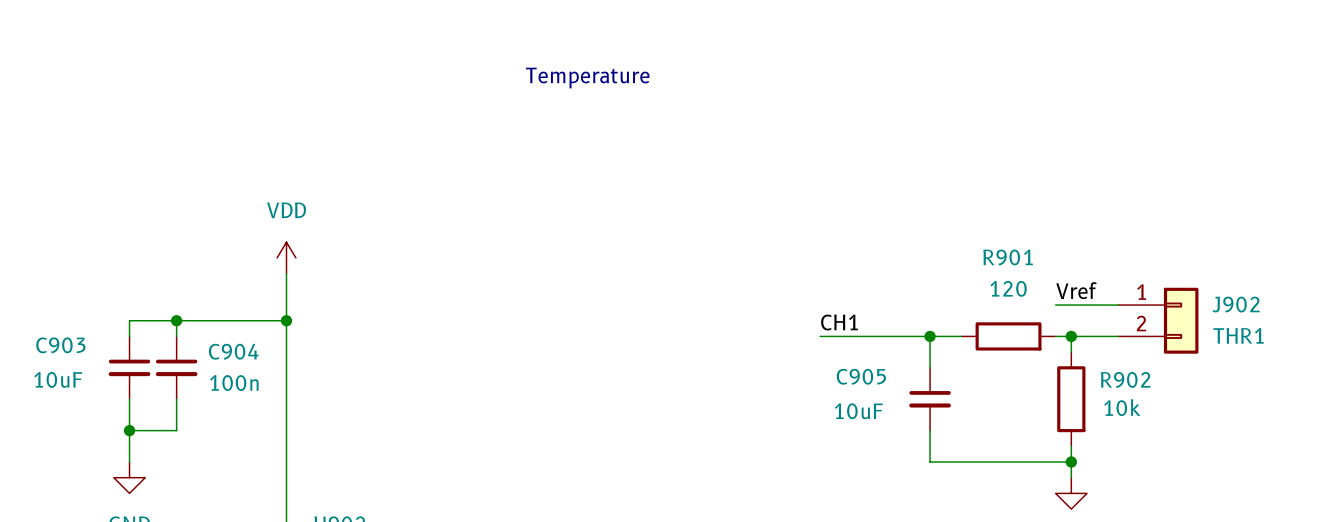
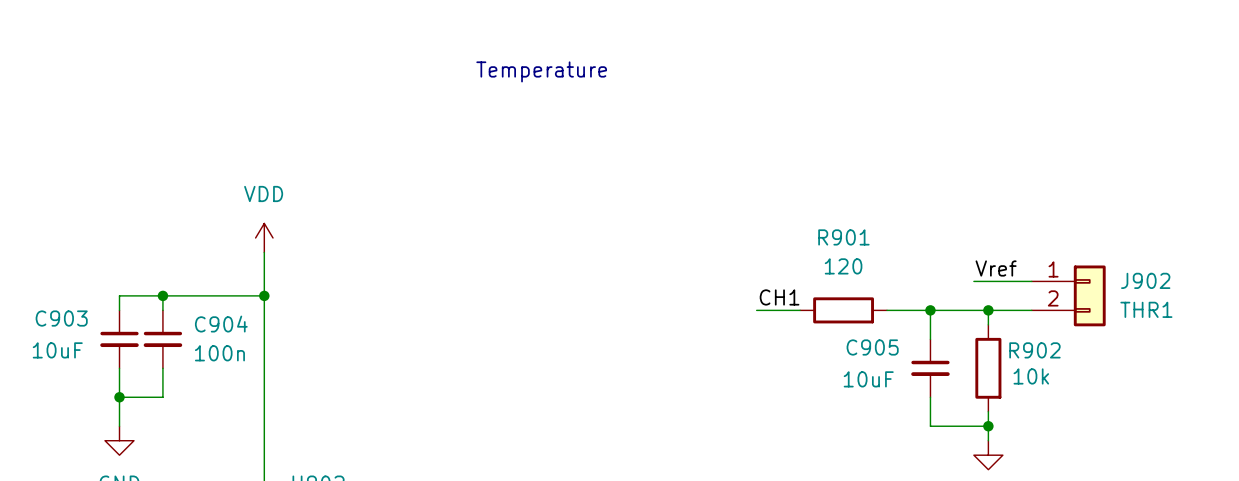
wire: (867, 336) (961, 336) -> (973, 310) (887, 310)
wire: (930, 336) (930, 367) -> (930, 310) (930, 339)
junction: (930, 336) -> none
junction: none -> (930, 310)
R901 position: (1008, 336) -> (843, 310)
C905 position: (930, 399) -> (930, 368)
wire: (930, 430) (930, 462) (1008, 462) -> (930, 397) (930, 426)

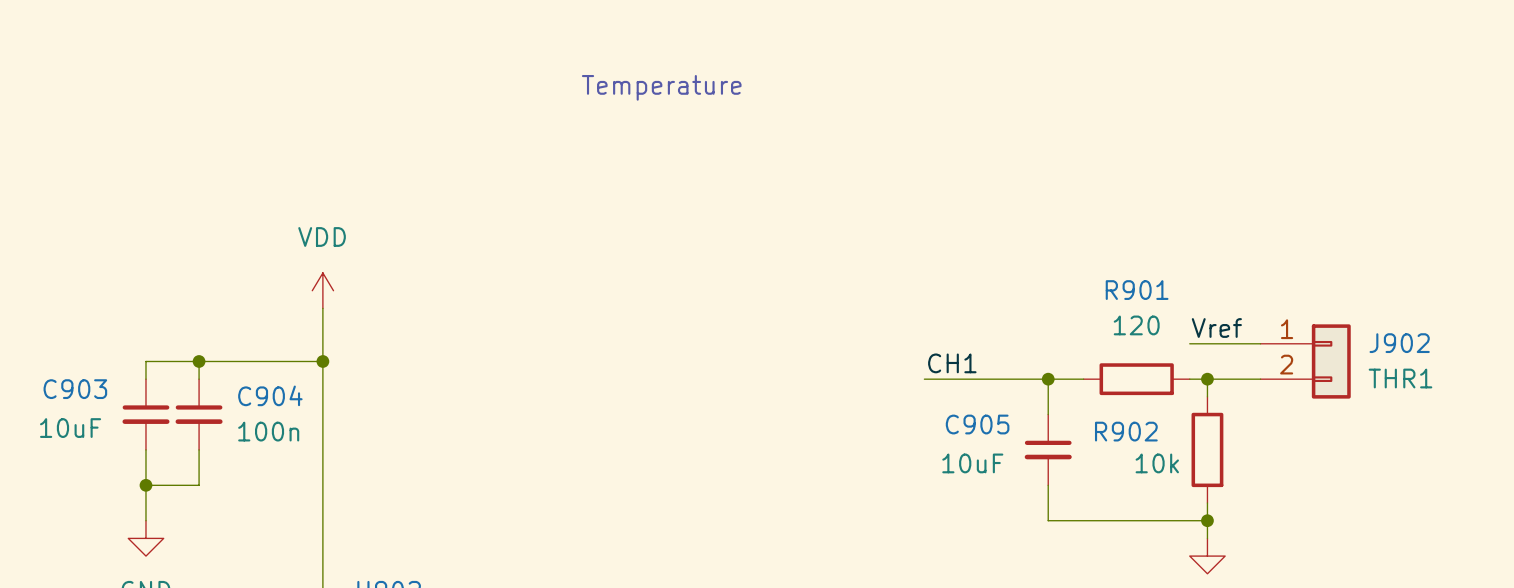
R901 position: (843, 310) -> (1136, 379)
junction: none -> (1048, 379)
wire: (887, 310) (973, 310) -> (1083, 379) (977, 379)
wire: (930, 310) (930, 339) -> (1048, 379) (1048, 414)
junction: (930, 310) -> none
R902 name position: R902 (1034, 350) -> R902 (1126, 431)
C905 position: (930, 368) -> (1048, 449)
R902 value position: 10k (1031, 376) -> 10k (1157, 463)
wire: (930, 397) (930, 426) -> (1048, 485) (1048, 520) (1136, 520)

